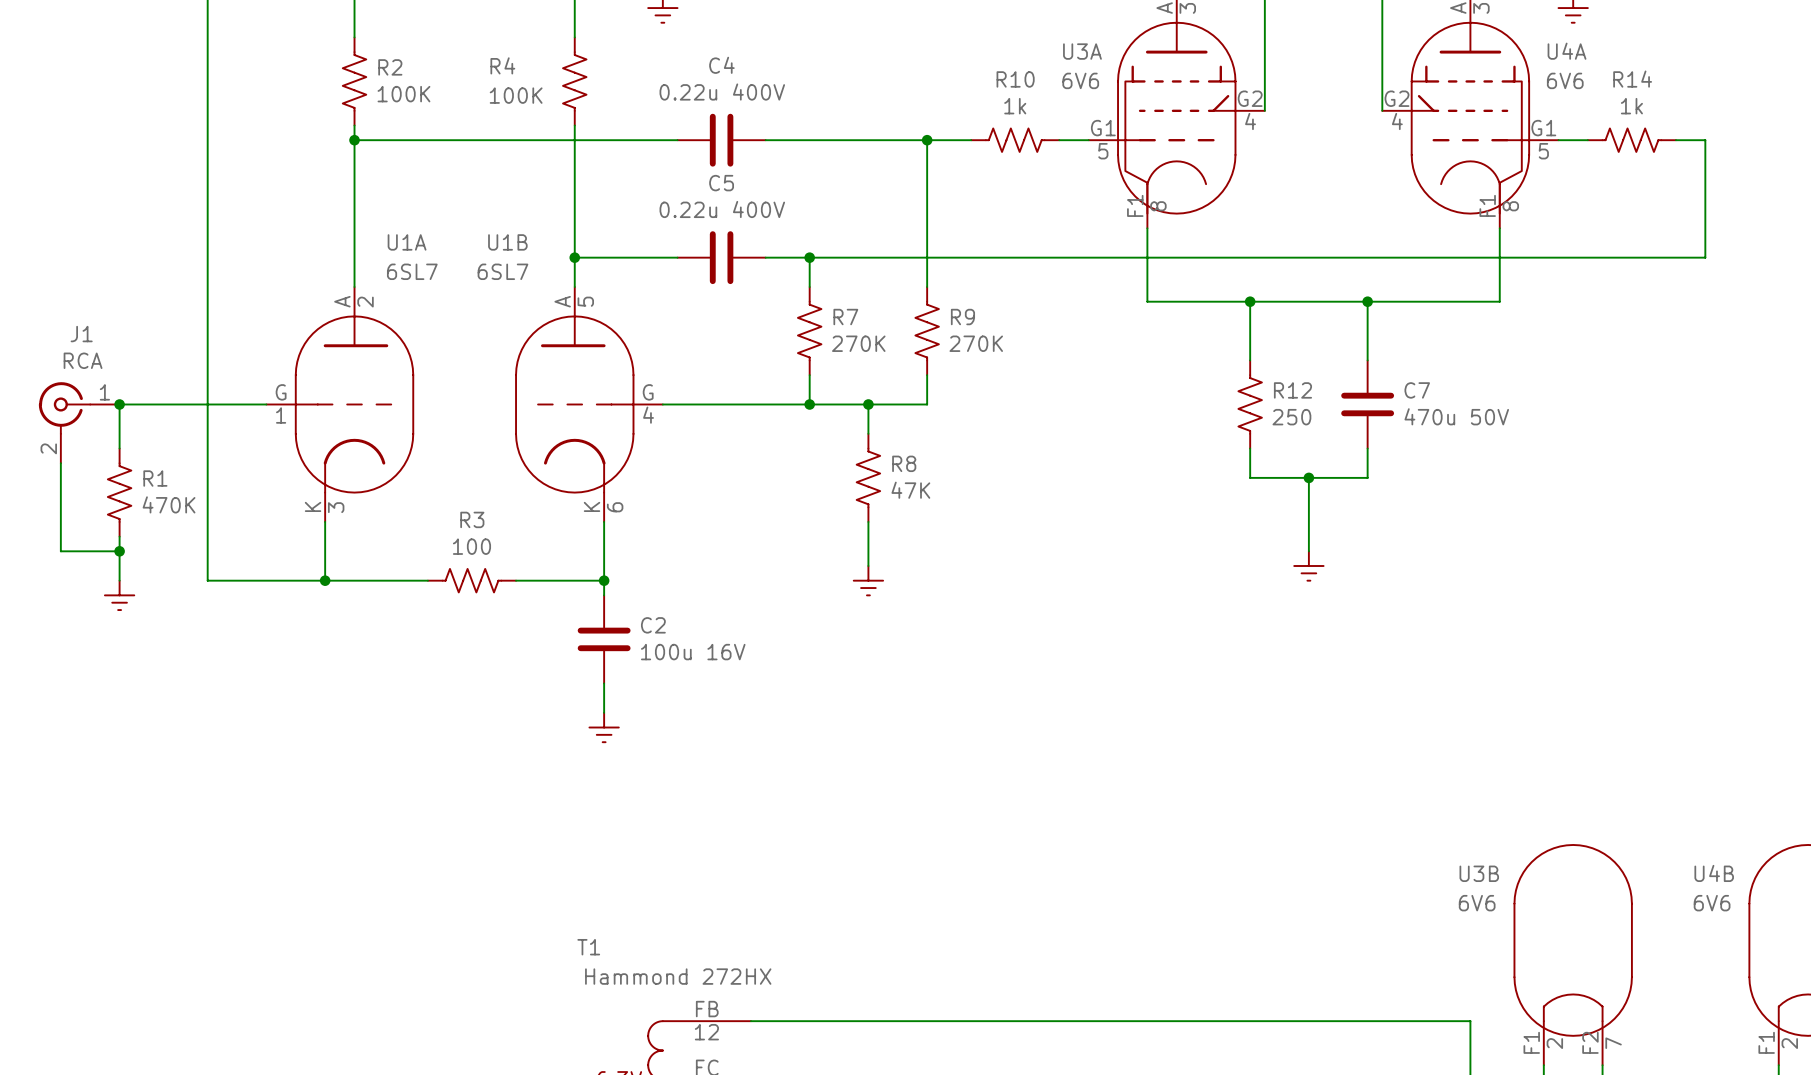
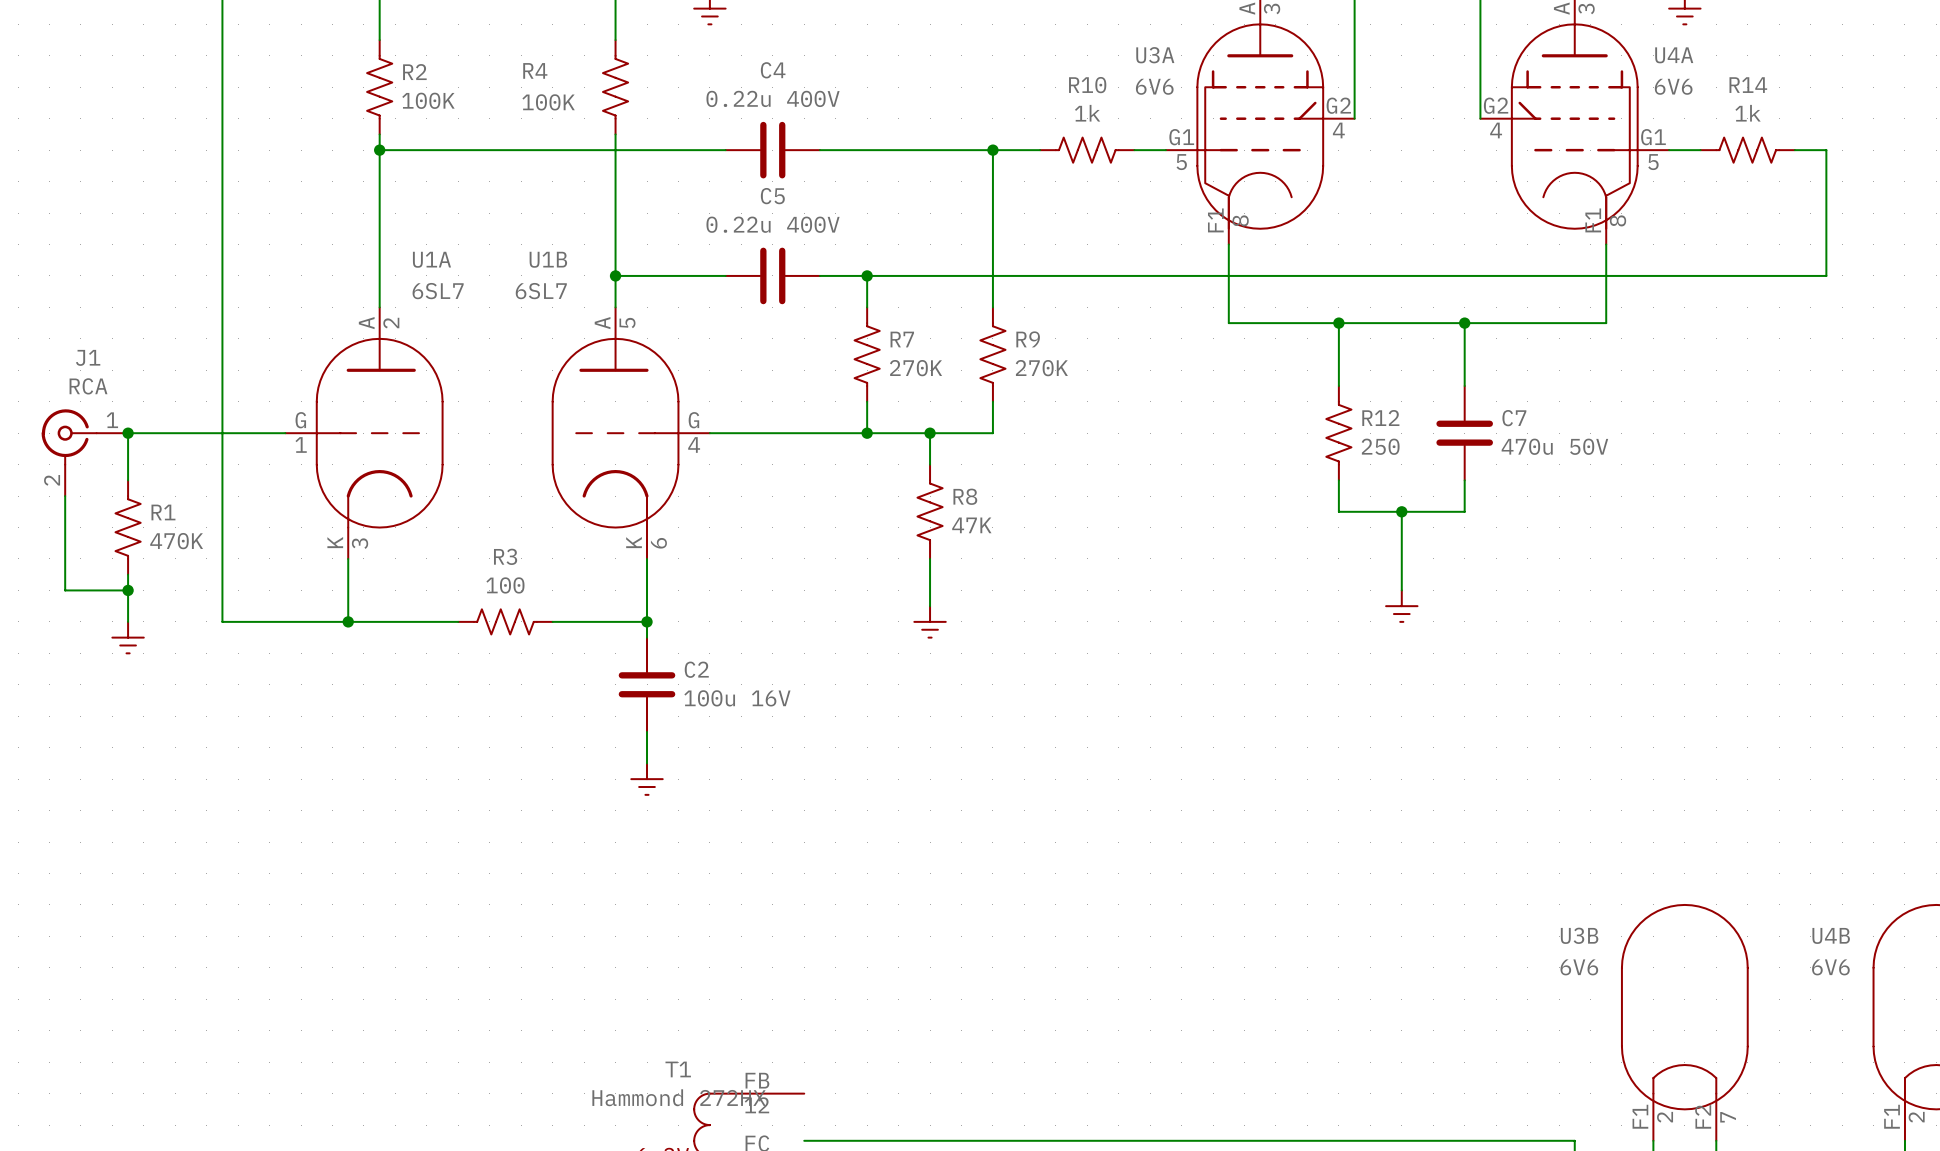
T1 name position: T1 (588, 947) -> T1 (678, 1069)
T1 value position: Hammond 272HX (678, 976) -> Hammond 272HX (679, 1097)
wire: (750, 1021) (1470, 1021) (1470, 1065) -> (804, 1140) (1574, 1140)

